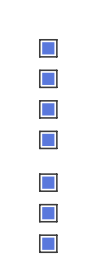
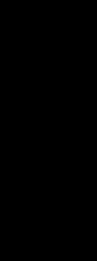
part: (48, 48) -> none
part: (48, 78) -> none
part: (48, 109) -> none
part: (48, 139) -> none
part: (48, 182) -> none
part: (48, 213) -> none
part: (48, 243) -> none

